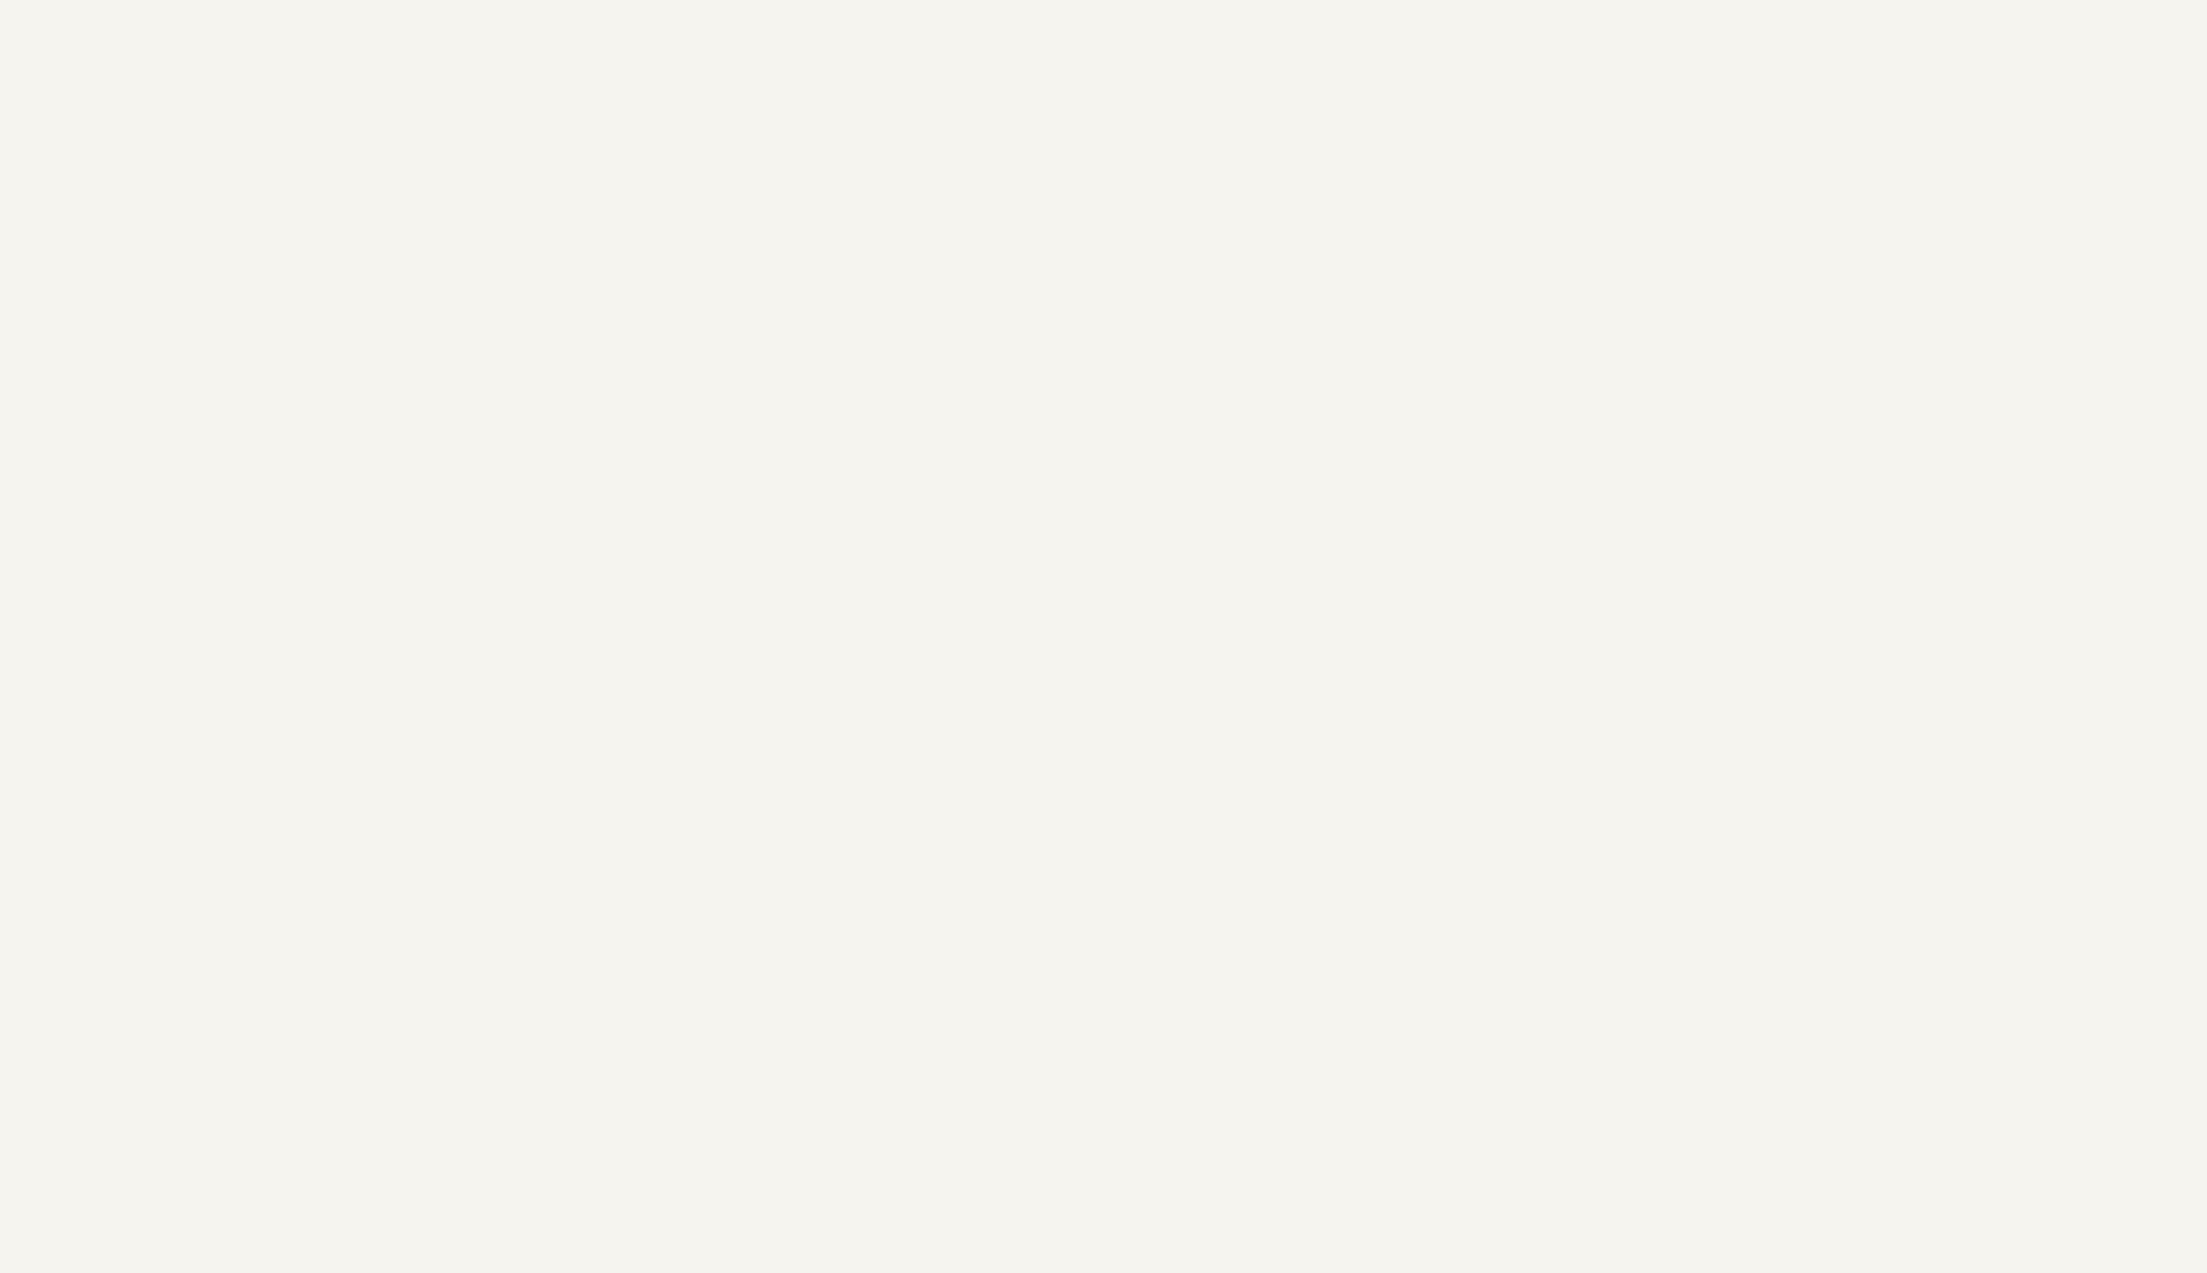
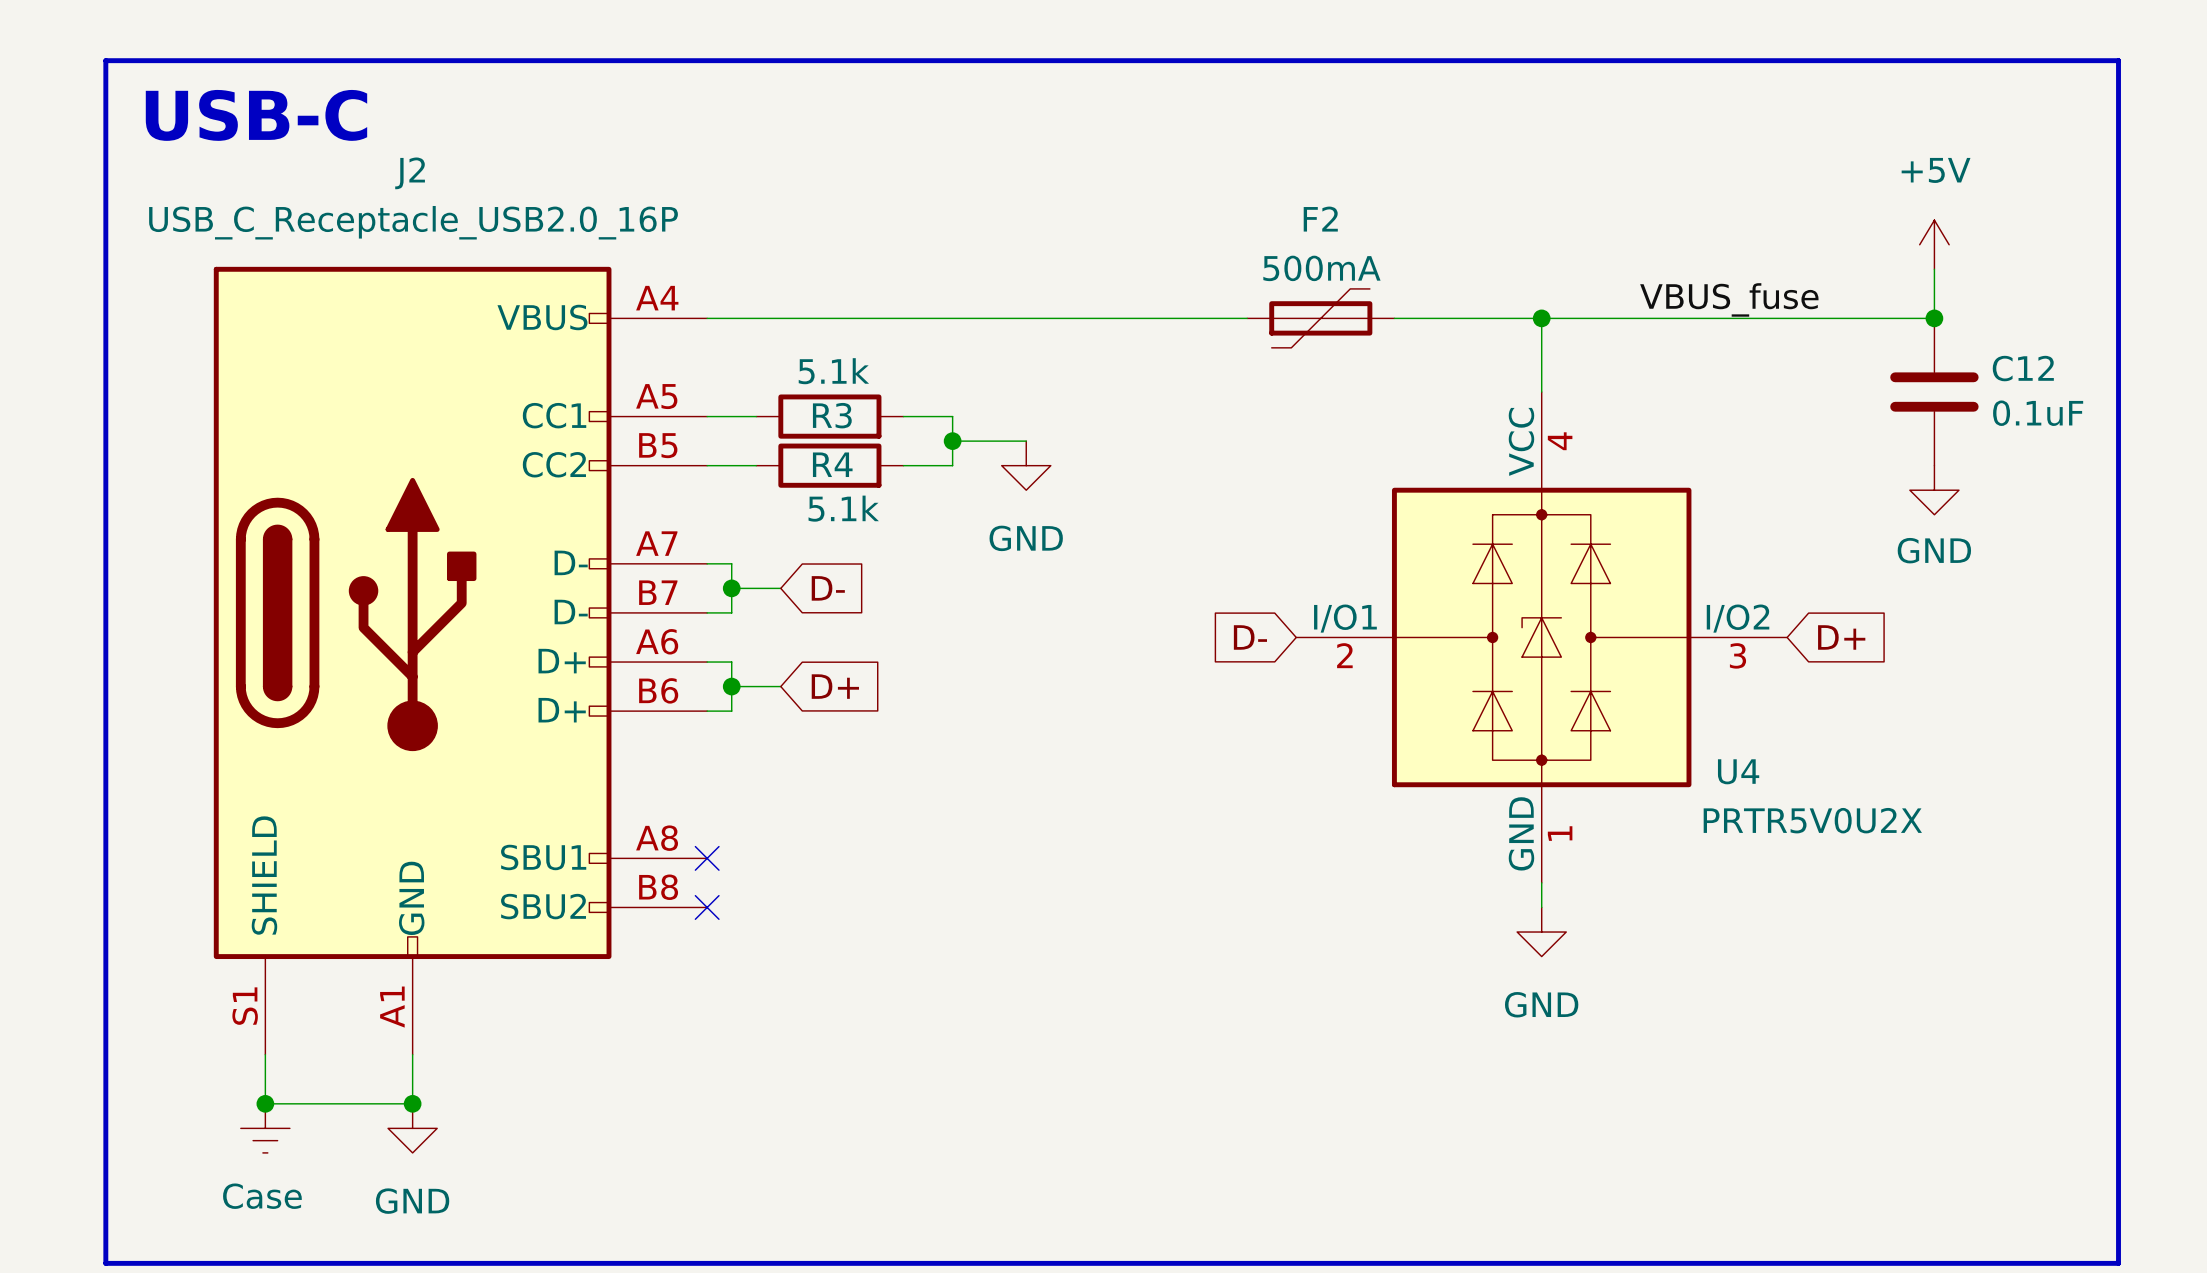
line: none -> (105, 60) (2118, 60) (2118, 1263) (105, 1263) (105, 60)
text: none -> USB-C (256, 115)
power symbol: none -> +5V (1934, 244)
wire: none -> (1934, 269) (1934, 318) (1394, 318)
label: none -> VBUS_fuse (1729, 299)
wire: none -> (707, 318) (1247, 318)
F2: none -> 500mA (1320, 318)
wire: none -> (1541, 318) (1541, 392)
junction: none -> (1541, 318)
junction: none -> (1934, 318)
C12: none -> 0.1uF (1934, 392)
wire: none -> (707, 416) (756, 416)
R3: none -> 5.1k (829, 416)
wire: none -> (903, 416) (952, 416) (952, 465) (903, 465)
wire: none -> (952, 441) (1026, 441)
junction: none -> (952, 441)
wire: none -> (707, 465) (756, 465)
R4: none -> 5.1k (829, 465)
power symbol: none -> GND (1026, 465)
power symbol: none -> GND (1934, 490)
wire: none -> (707, 563) (731, 563) (731, 612) (707, 612)
wire: none -> (731, 588) (780, 588)
junction: none -> (731, 588)
global label: none -> D- (828, 588)
global label: none -> D- (1250, 637)
U4: none -> PRTR5V0U2X (1541, 637)
global label: none -> D+ (1841, 637)
J2: none -> USB_C_Receptacle_USB2.0_16P (460, 660)
wire: none -> (707, 662) (731, 662) (731, 711) (707, 711)
wire: none -> (731, 686) (780, 686)
junction: none -> (731, 686)
global label: none -> D+ (835, 686)
no-connect mark: none -> (707, 858)
wire: none -> (1541, 882) (1541, 907)
no-connect mark: none -> (707, 907)
power symbol: none -> GND (1541, 932)
wire: none -> (265, 1054) (265, 1103) (412, 1103) (412, 1054)
junction: none -> (265, 1103)
junction: none -> (412, 1103)
power symbol: none -> Case (265, 1128)
power symbol: none -> GND (412, 1128)

